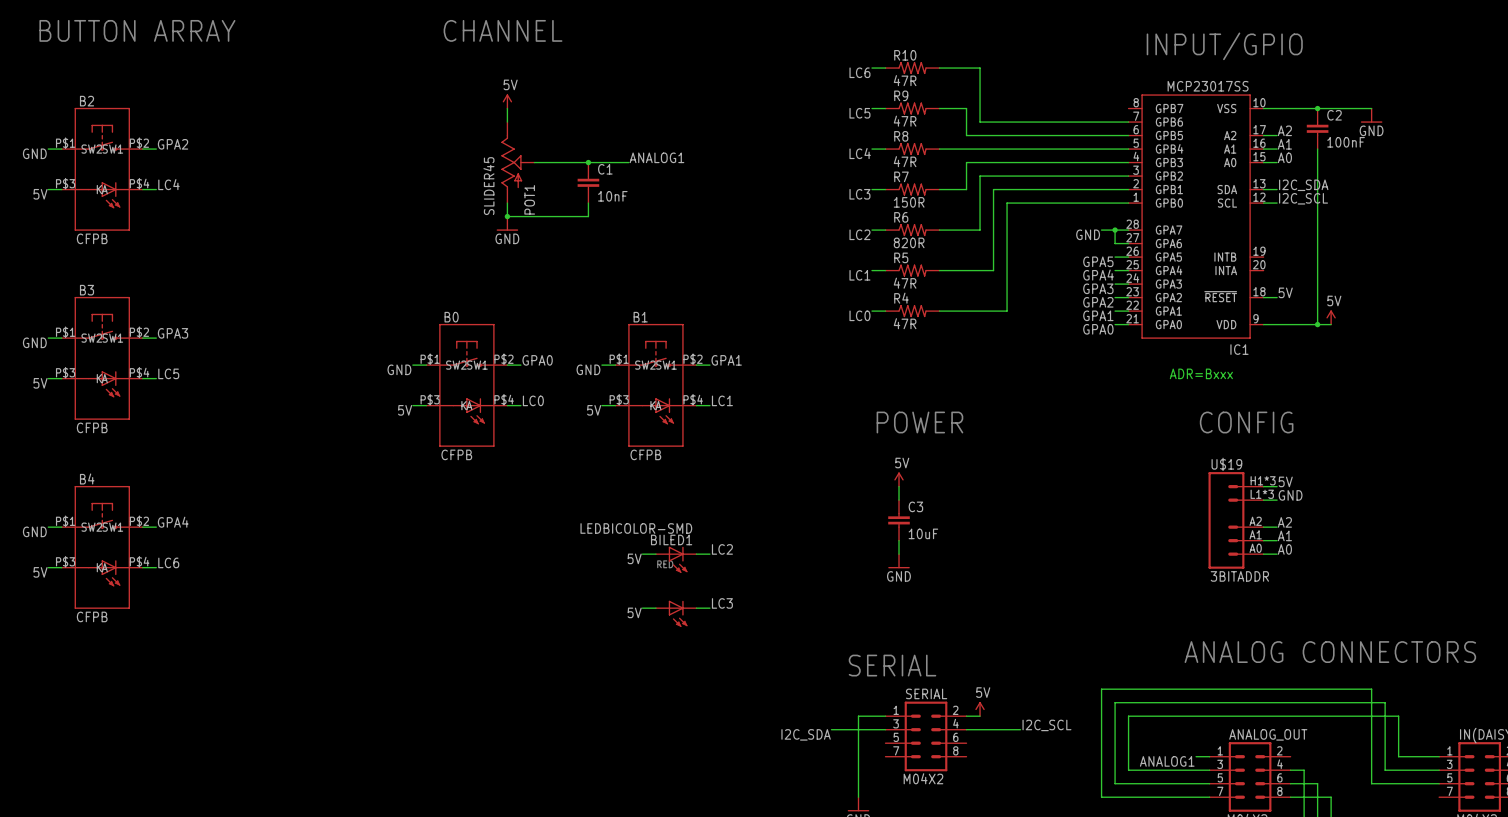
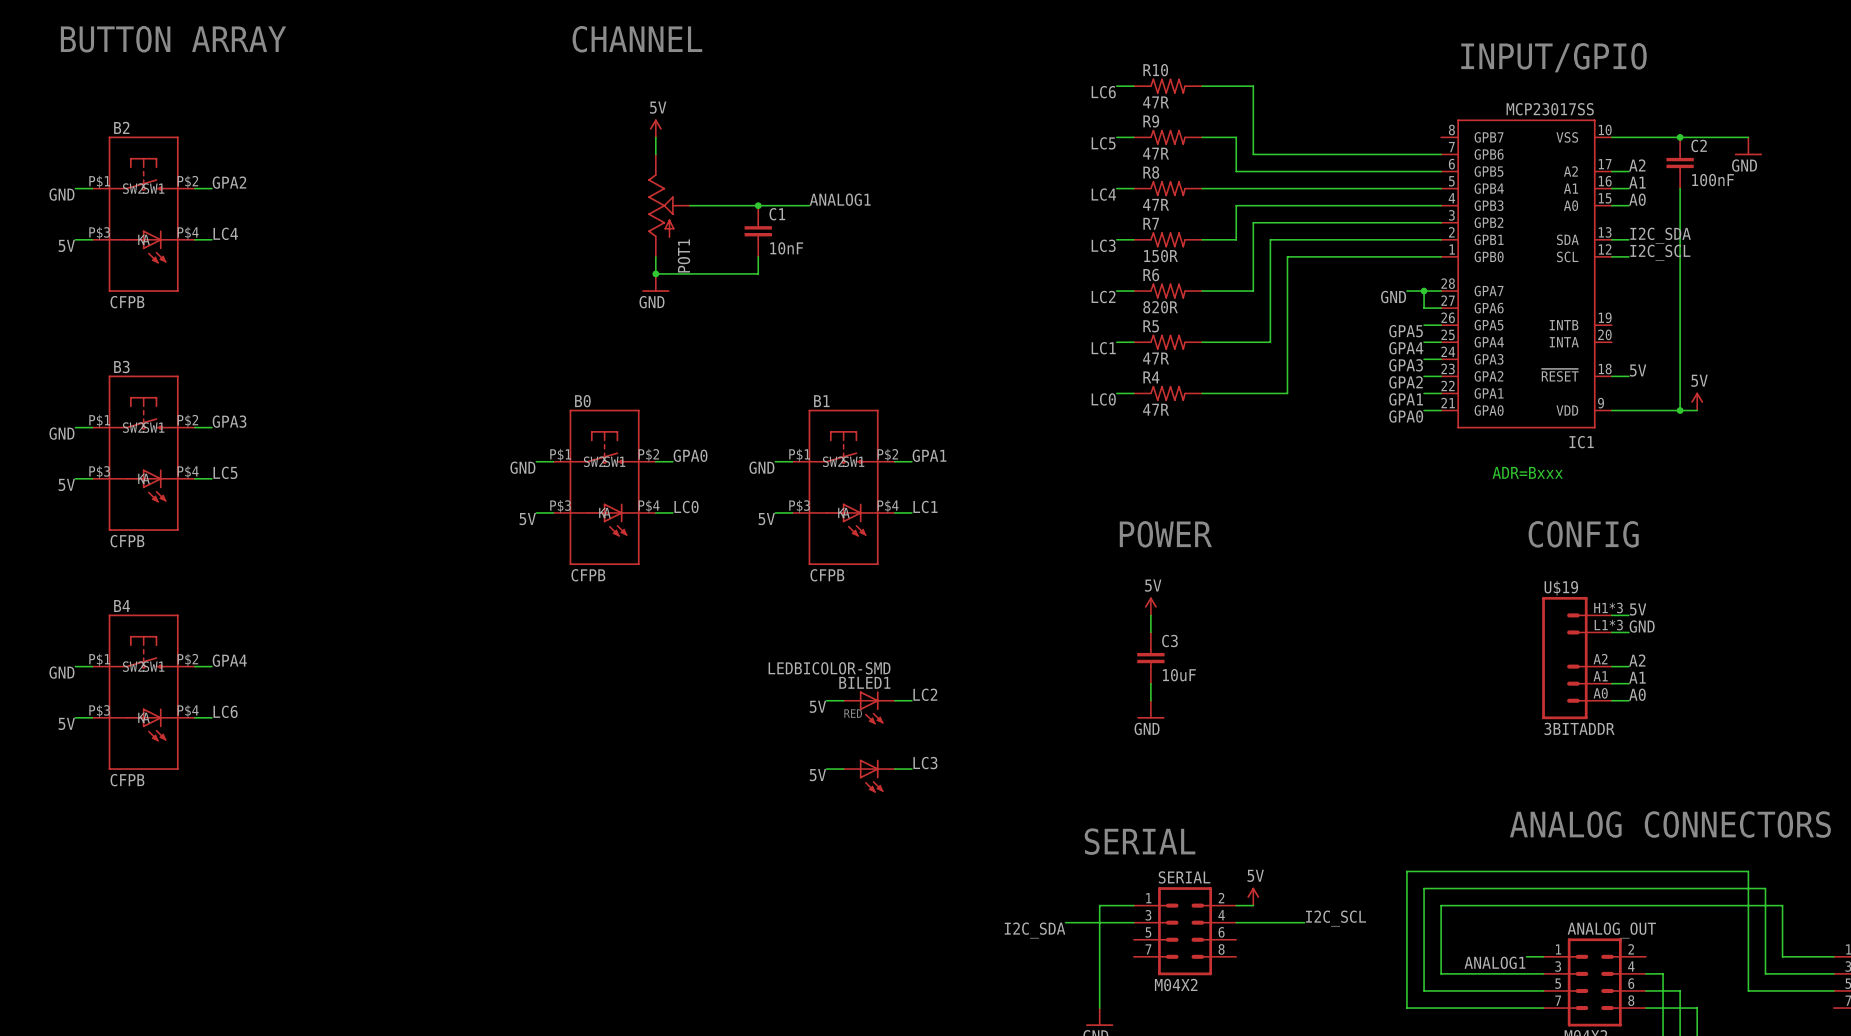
POT1 value: SLIDER45 (488, 186) -> none

